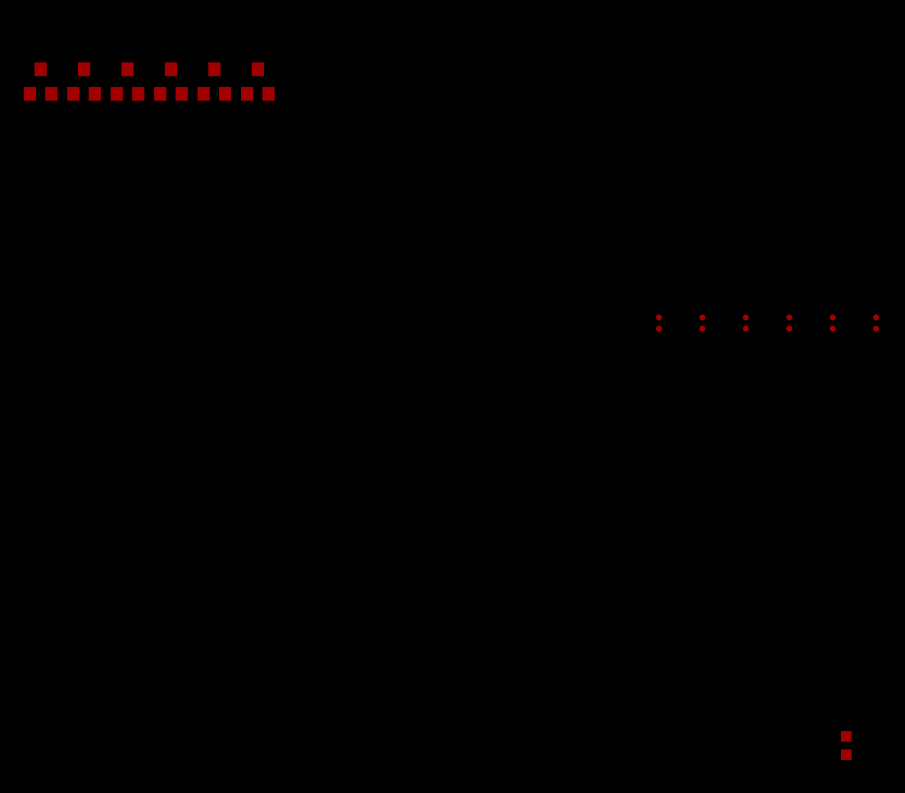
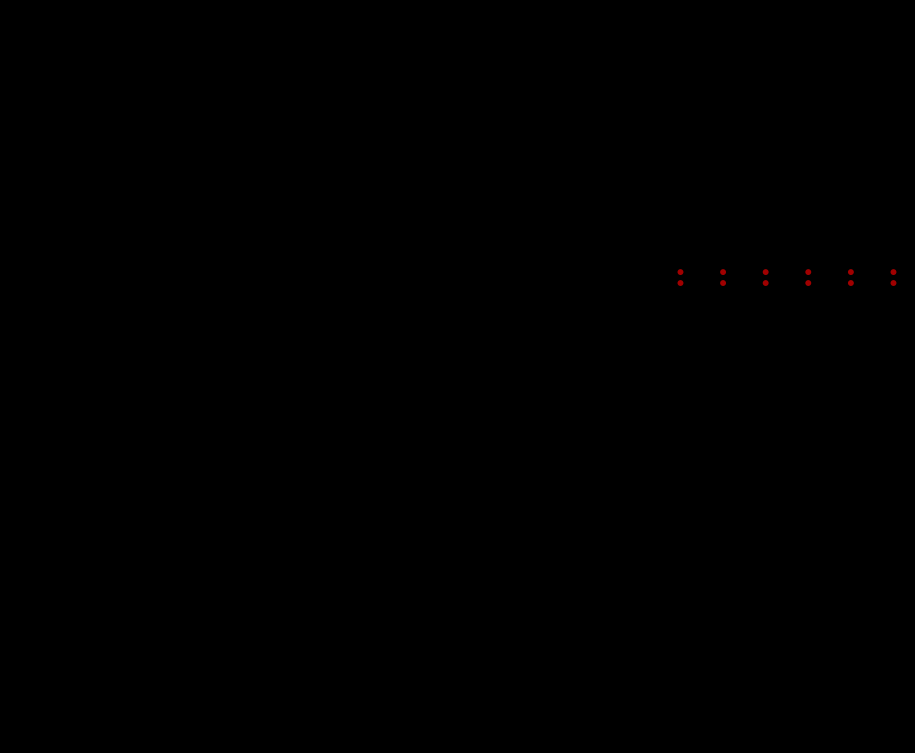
part: (40, 81) -> none
part: (84, 81) -> none
part: (127, 81) -> none
part: (170, 81) -> none
part: (214, 81) -> none
part: (257, 81) -> none
part: (846, 745) -> none

